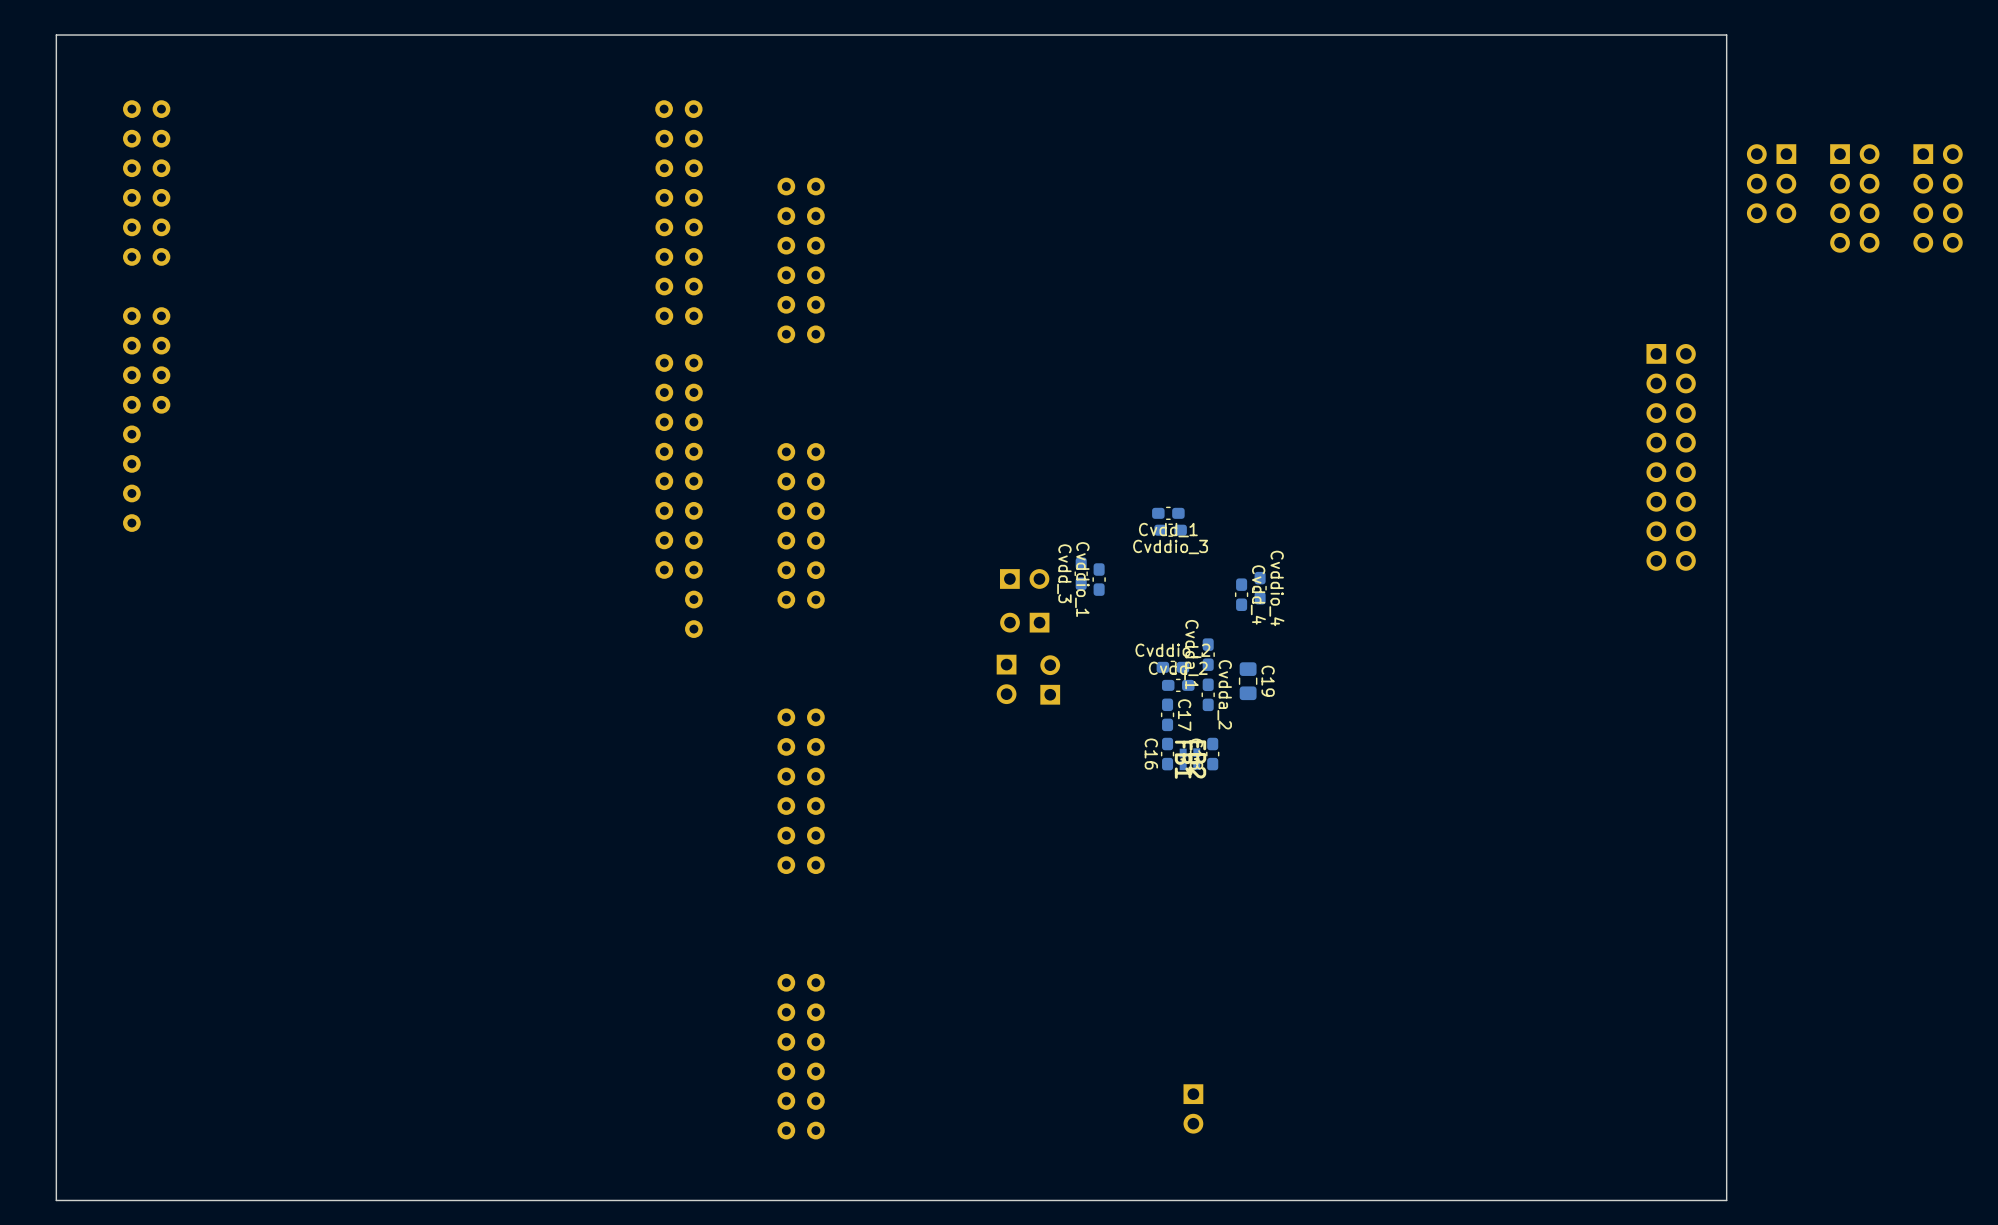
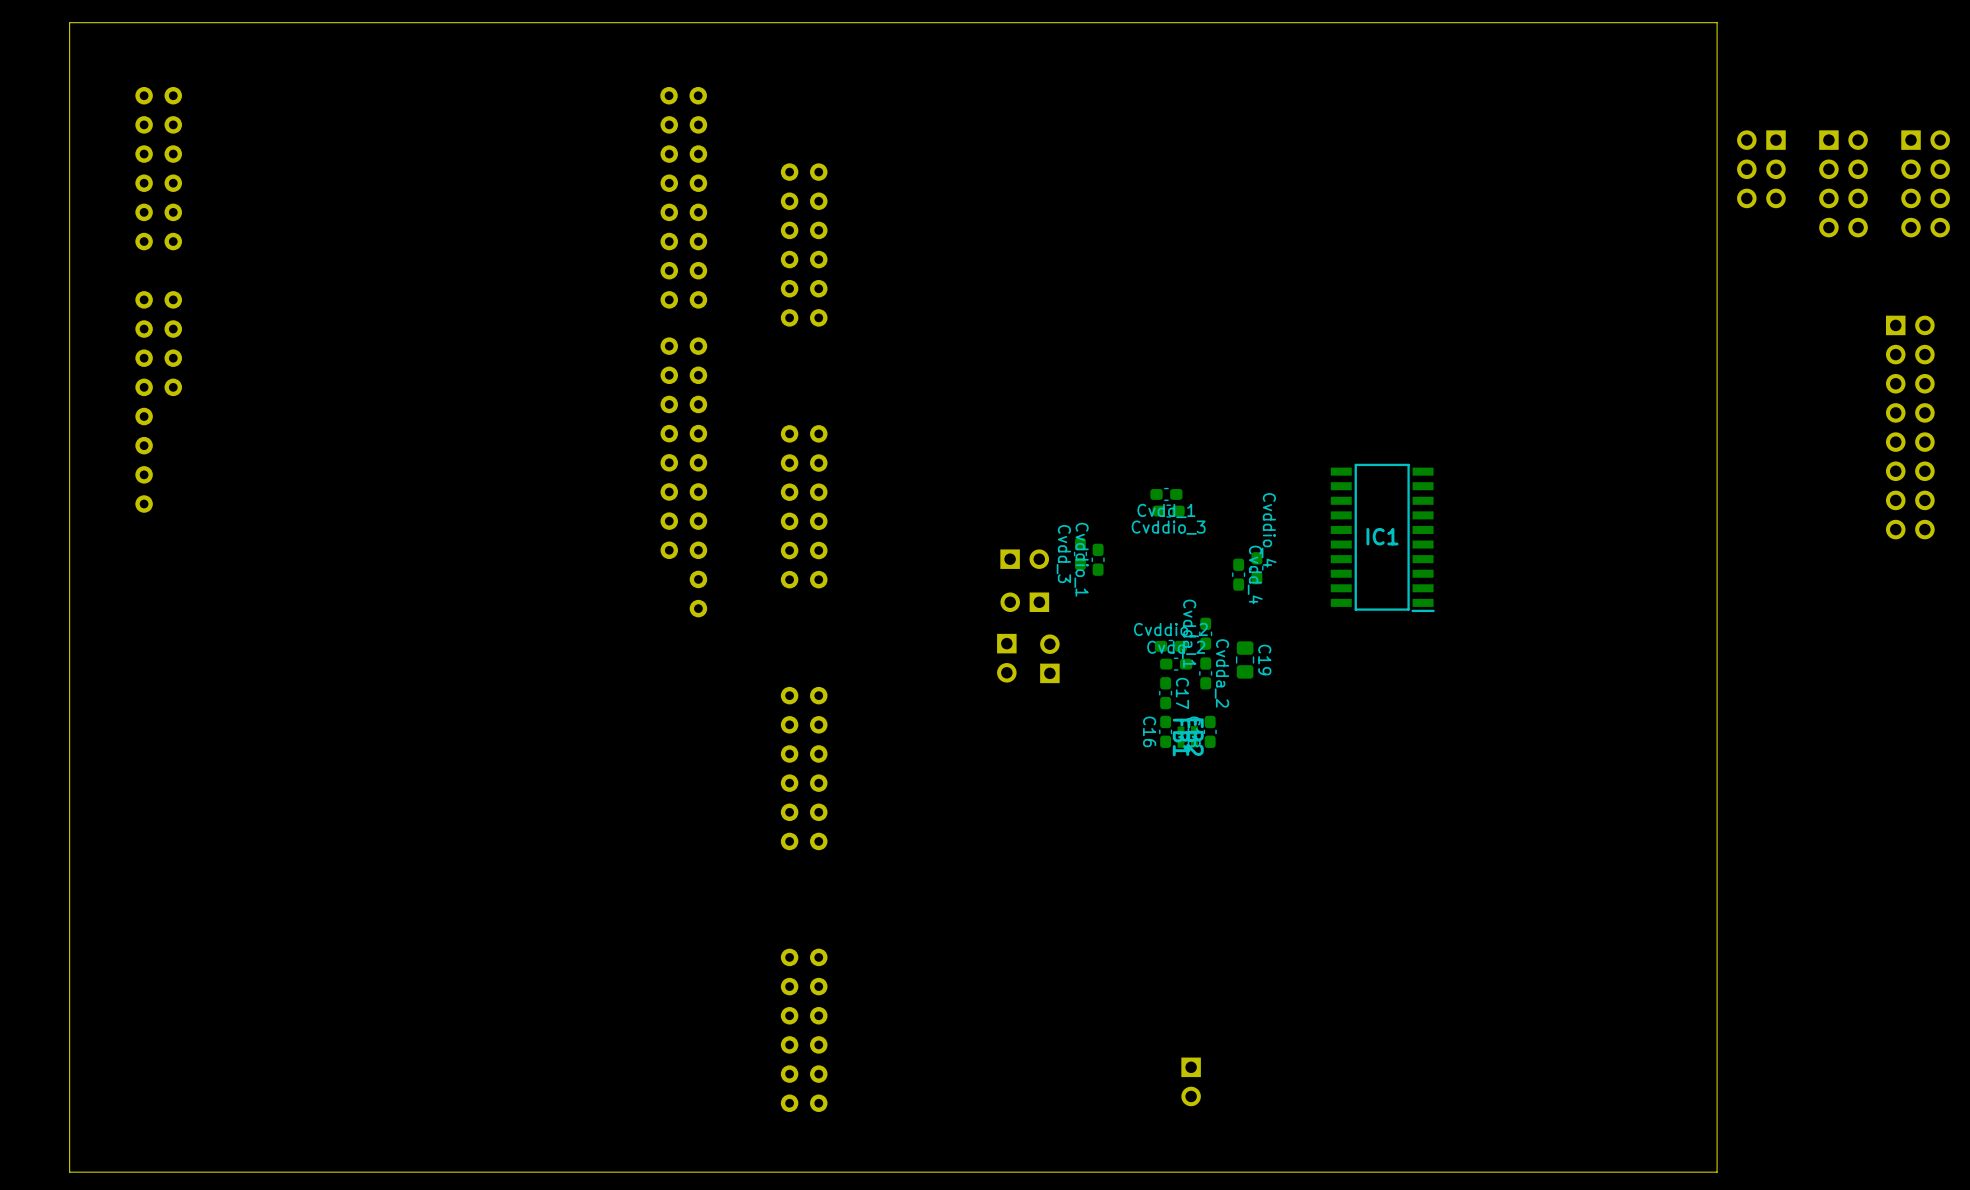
part position: (1671, 457) -> (1910, 427)
IC1: none -> (1382, 537)
Cvddio_4 name position: Cvddio_4 (1276, 588) -> Cvddio_4 (1269, 530)

